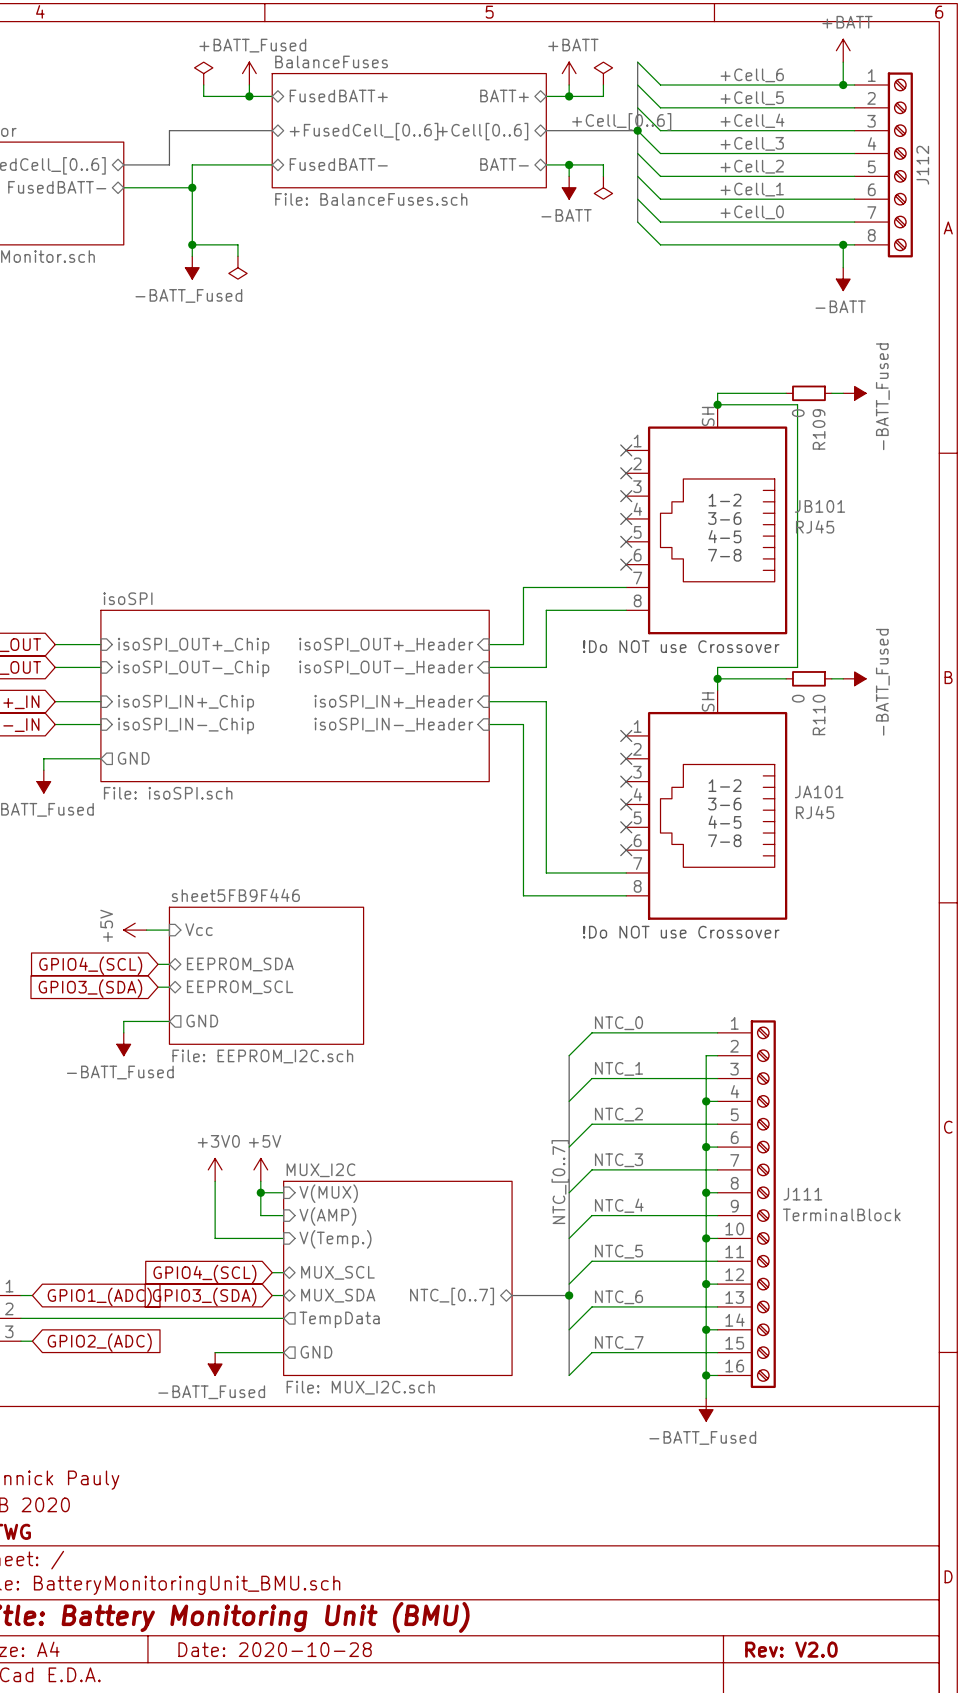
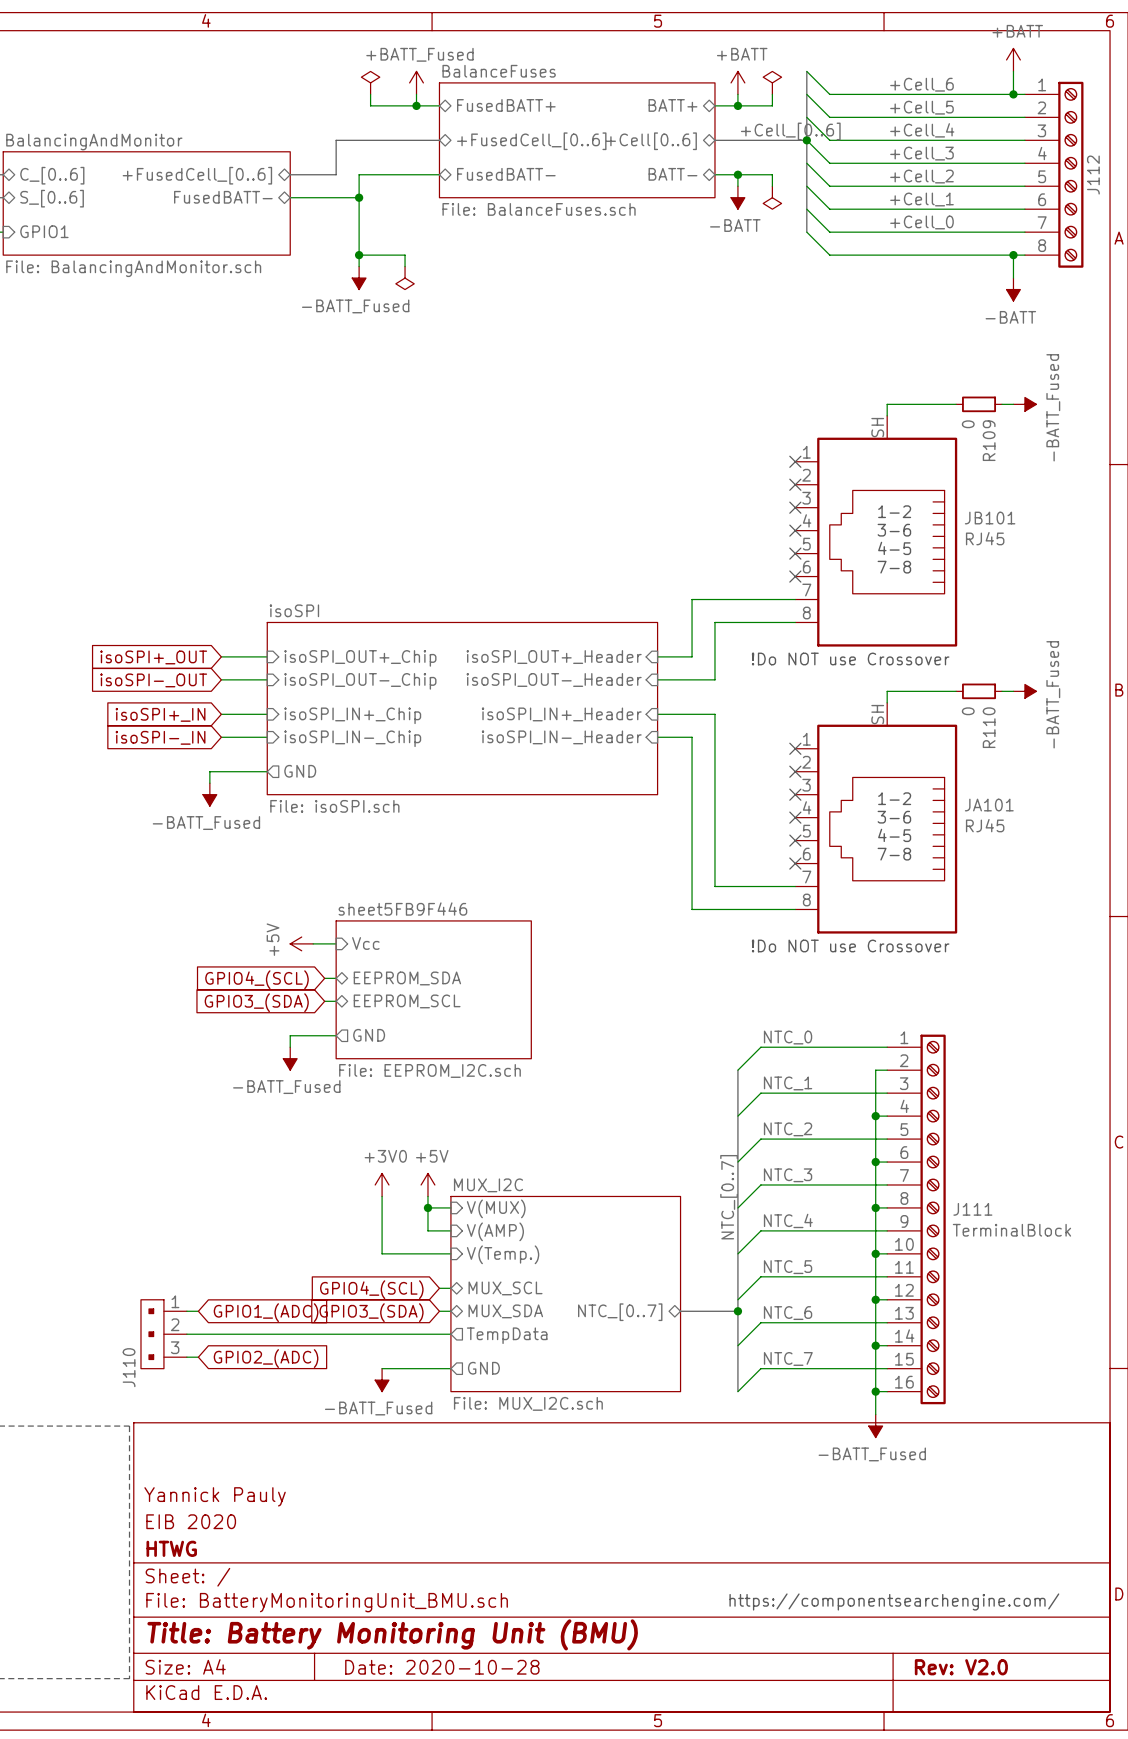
wire: (717, 404) (797, 404) (797, 667) (717, 667) (717, 678) -> none
junction: (717, 404) -> none
junction: (717, 678) -> none
text: none -> https://componentsearchengine.com/ (894, 1601)

